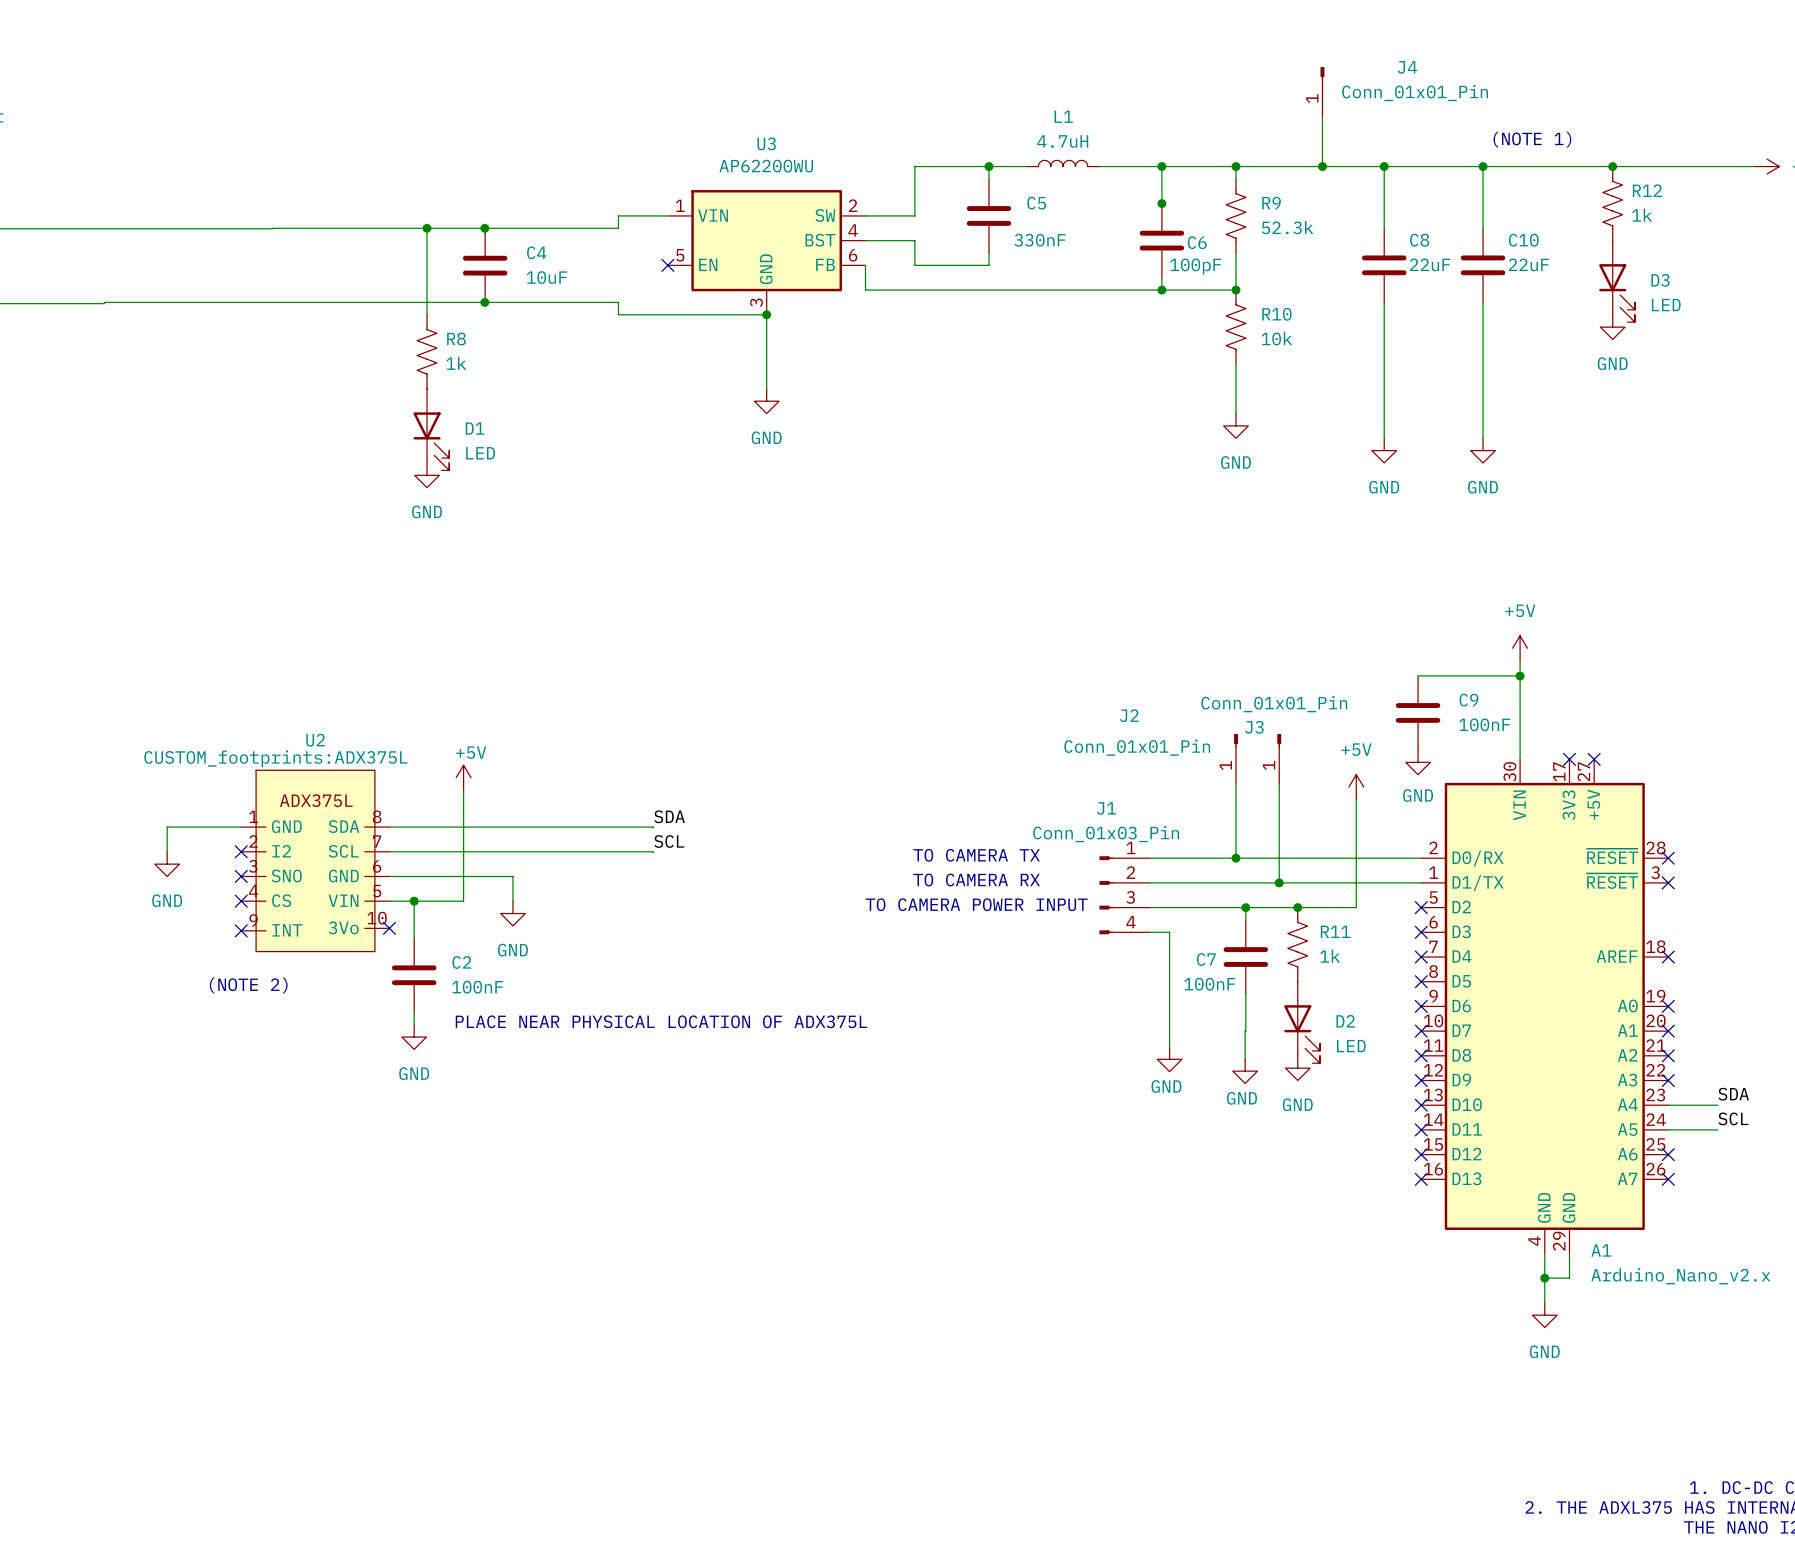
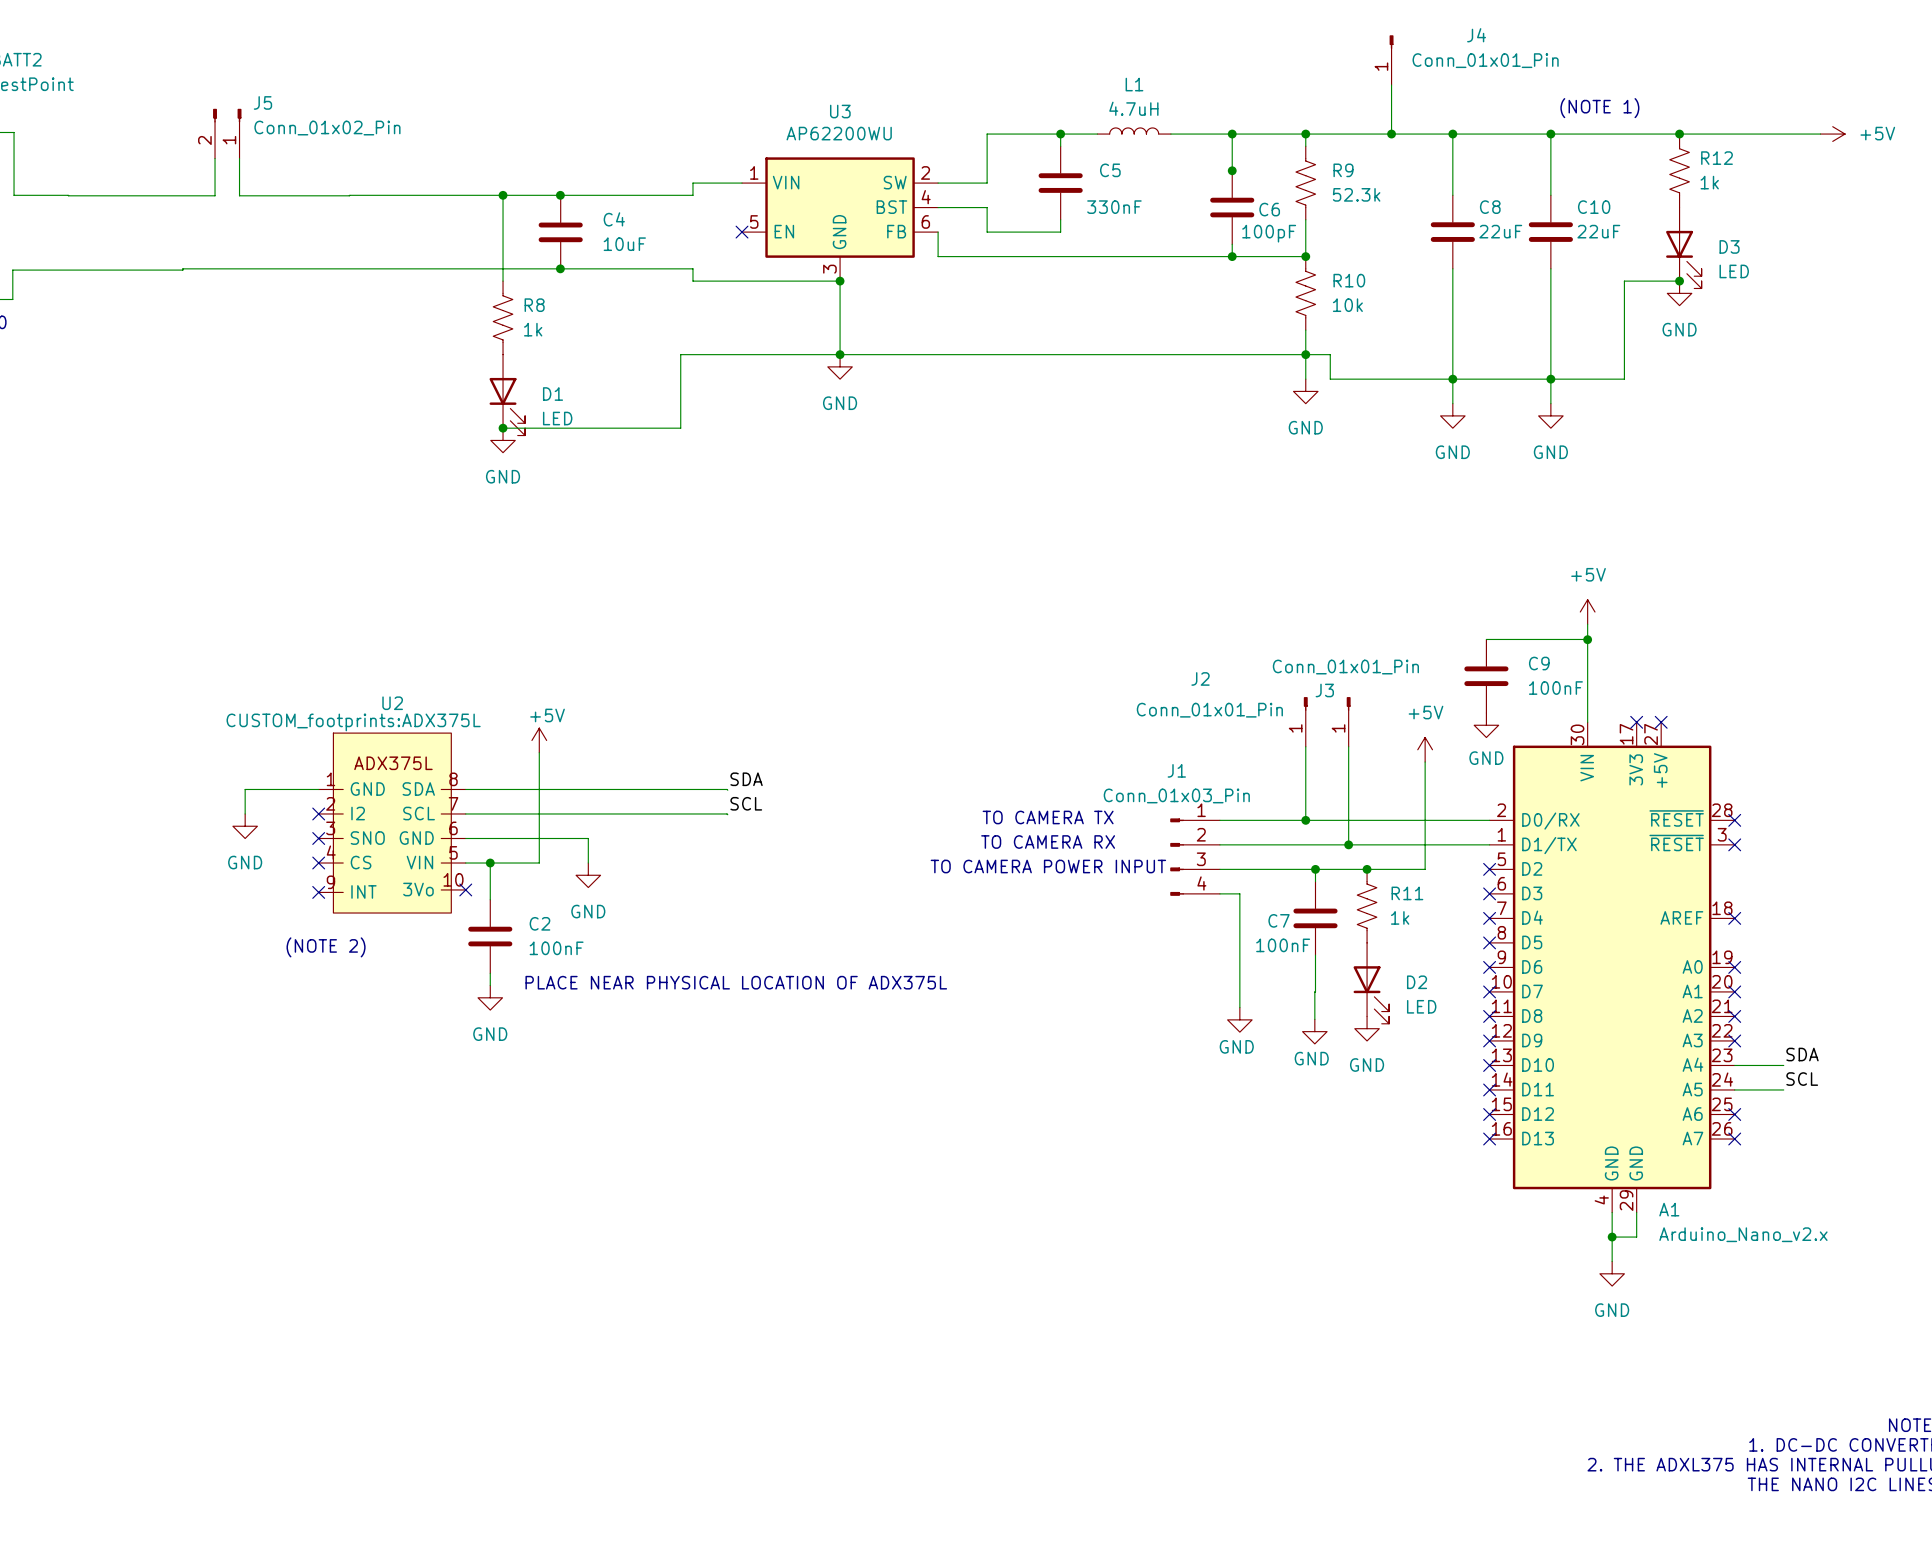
J5: none -> Conn_01x02_Pin (227, 133)
wire: none -> (239, 158) (239, 195)
wire: (136, 228) (161, 228) -> (215, 195) (215, 158)
wire: none -> (1679, 281) (1624, 281) (1624, 379) (1330, 379) (1330, 354) (680, 354) (680, 428) (503, 428)
junction: none -> (1679, 281)
junction: none -> (840, 354)
junction: none -> (1305, 354)
junction: none -> (1452, 379)
junction: none -> (1550, 379)
junction: none -> (503, 428)

